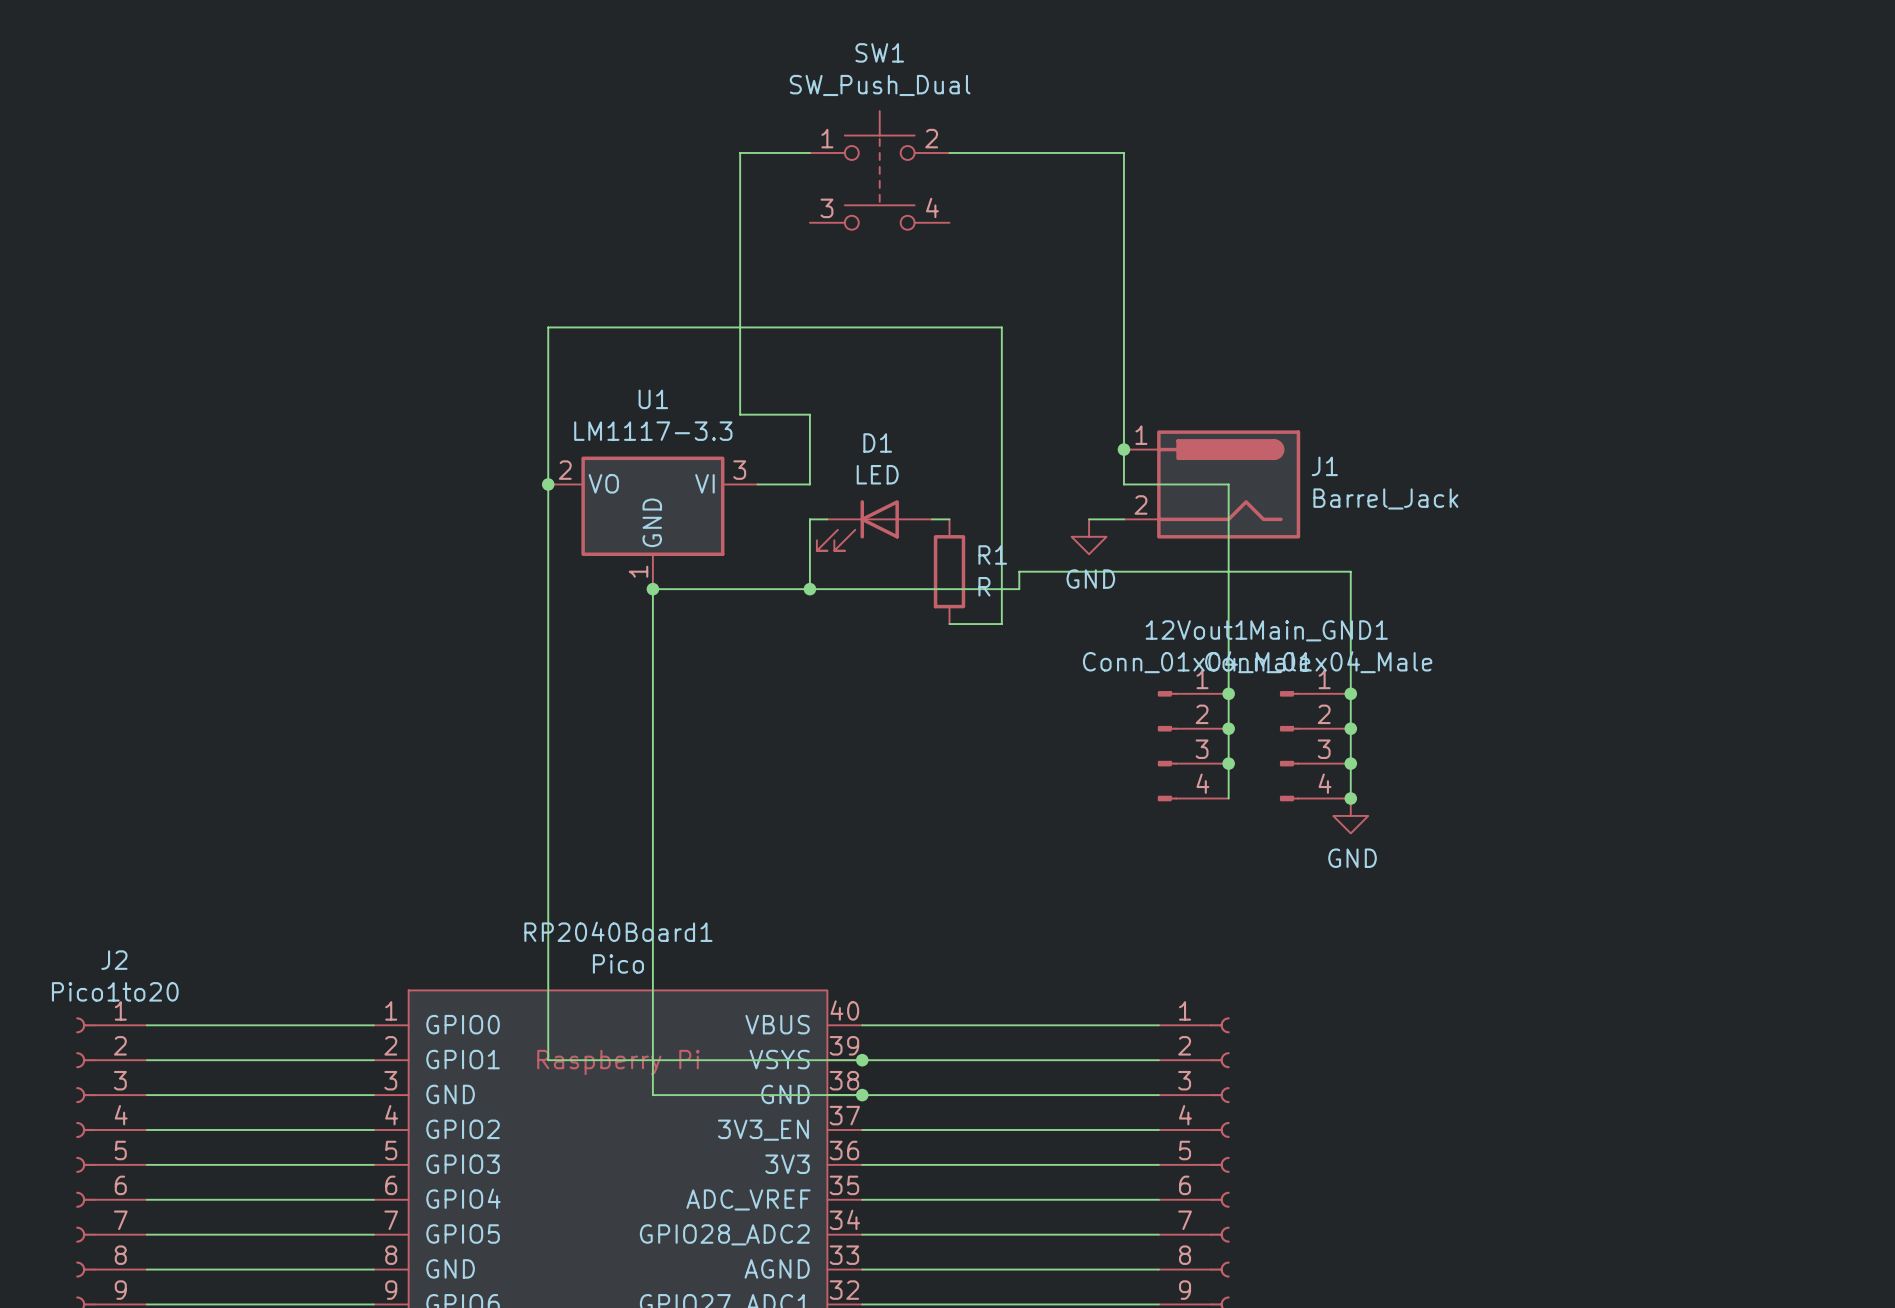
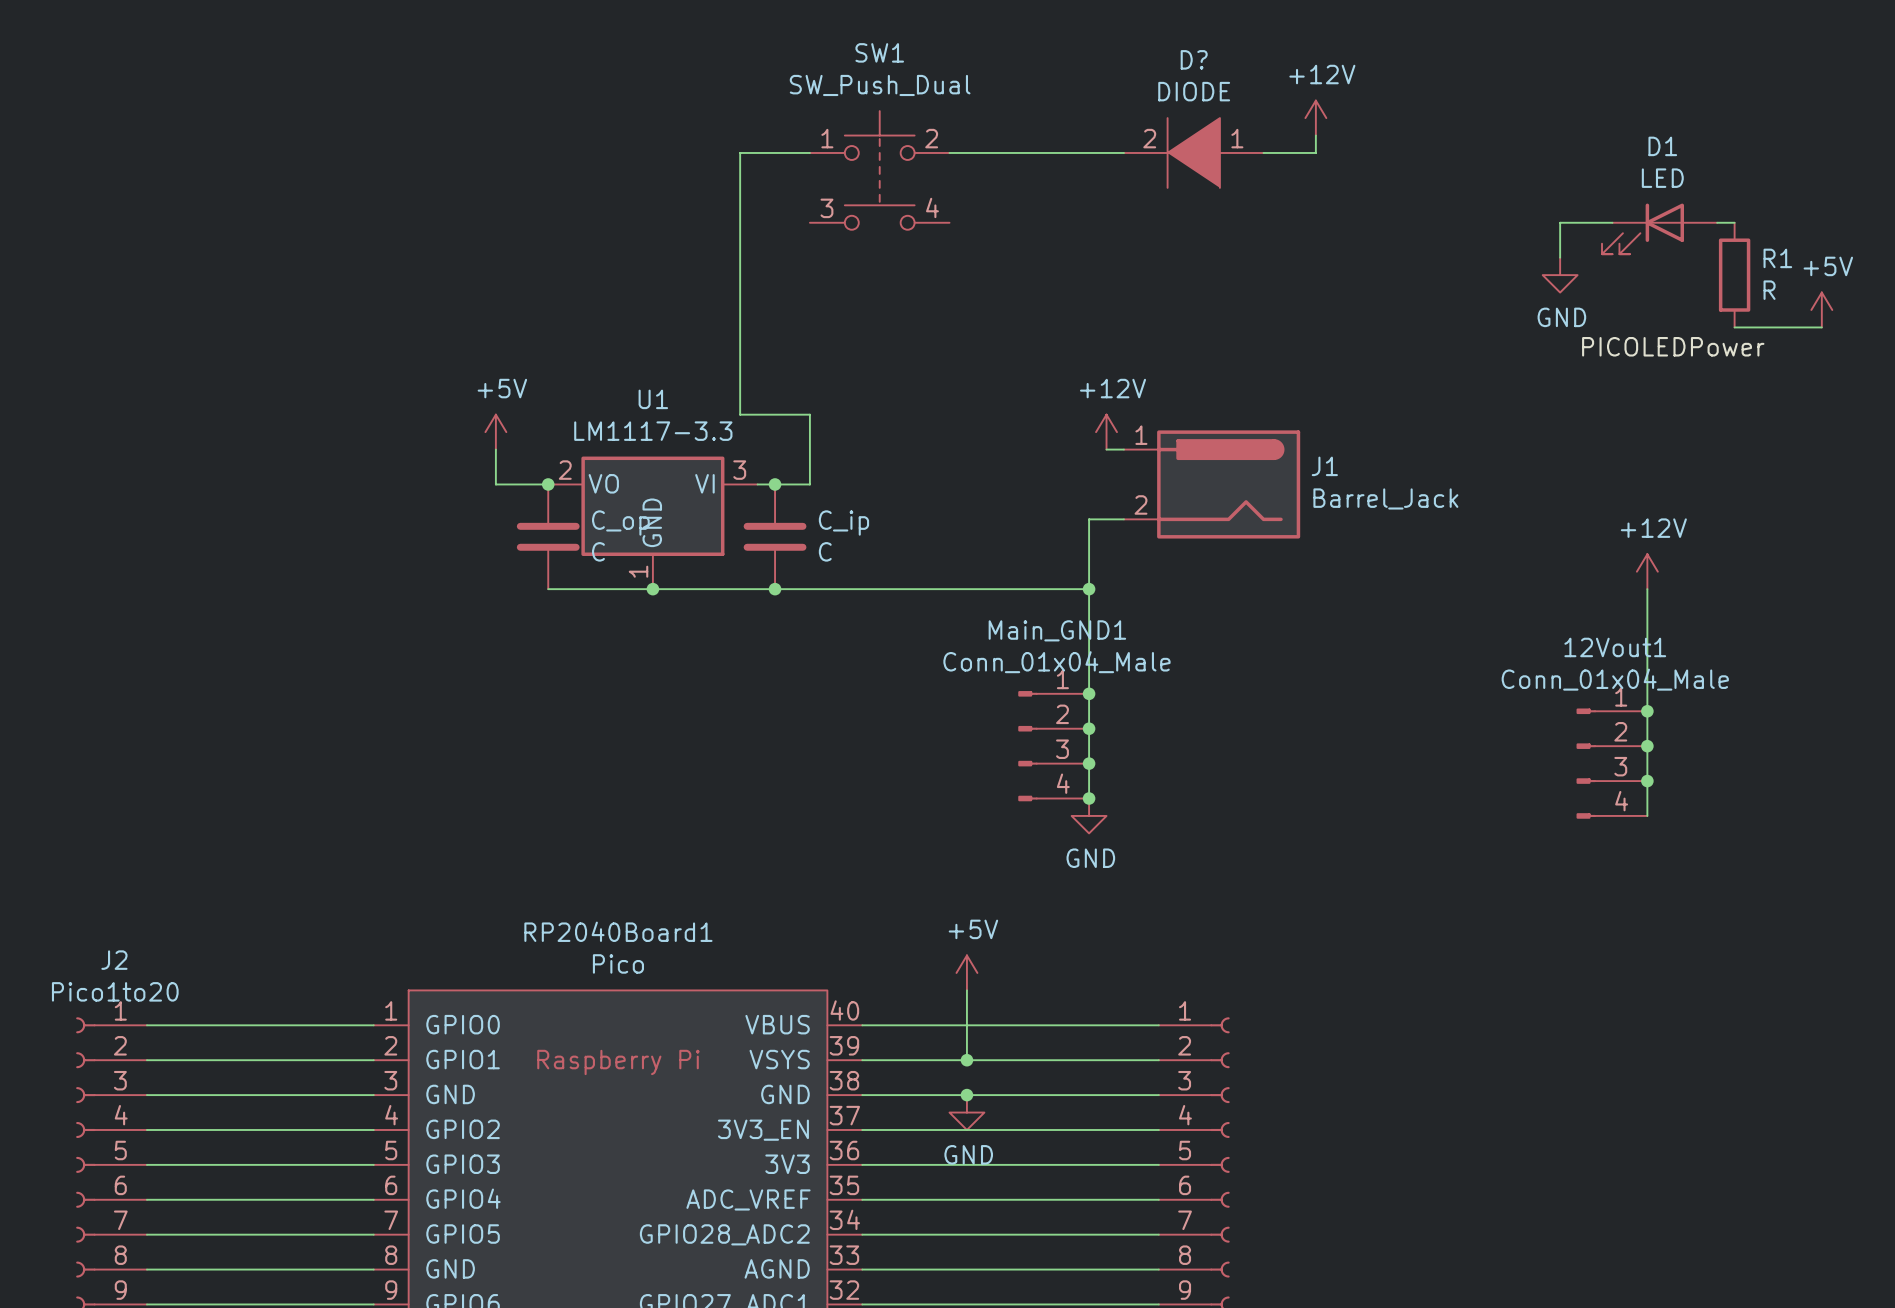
power symbol: none -> +12V (1315, 118)
wire: none -> (1315, 135) (1315, 152) (1263, 152)
wire: (1123, 152) (1123, 484) (1228, 484) (1228, 798) -> none
D?: none -> DIODE (1193, 152)
wire: none -> (1612, 222) (1560, 222) (1560, 257)
wire: none -> (1717, 222) (1734, 222)
power symbol: none -> GND (1560, 275)
power symbol: none -> +5V (1821, 310)
wire: none -> (1734, 327) (1821, 327)
label: none -> PICOLEDPower (1673, 346)
power symbol: none -> +5V (495, 432)
power symbol: none -> +12V (1106, 432)
wire: none -> (495, 449) (495, 484) (548, 484)
junction: (1123, 449) -> none
junction: none -> (775, 484)
wire: (827, 519) (809, 519) (809, 589) -> none
wire: (932, 519) (949, 519) -> (1106, 449) (1123, 449)
wire: none -> (1089, 519) (1089, 798)
D1 position: (874, 525) -> (1659, 228)
C_op: none -> C (548, 536)
C_ip: none -> C (775, 536)
power symbol: GND (1089, 536) -> none
R1 position: (949, 571) -> (1734, 275)
power symbol: none -> +12V (1647, 571)
wire: (652, 589) (652, 1095) (862, 1095) -> (652, 589) (548, 589)
junction position: (809, 589) -> (775, 589)
wire: (1019, 589) (1019, 571) (1350, 571) (1350, 798) -> (1019, 589) (1089, 589)
junction: none -> (1089, 589)
wire: none -> (1647, 589) (1647, 815)
wire: (949, 624) (1001, 624) (1001, 327) (548, 327) (548, 1060) (862, 1060) -> none
junction: none -> (1089, 693)
junction: (1228, 693) -> none
junction: (1350, 693) -> none
junction: none -> (1647, 711)
junction: none -> (1089, 728)
junction: (1228, 728) -> none
junction: (1350, 728) -> none
12Vout1 position: (1193, 746) -> (1611, 763)
Main_GND1 position: (1315, 746) -> (1053, 746)
junction: none -> (1647, 746)
junction: none -> (1089, 763)
junction: (1228, 763) -> none
junction: (1350, 763) -> none
junction: none -> (1647, 781)
junction: none -> (1089, 798)
junction: (1350, 798) -> none
power symbol: none -> GND (1089, 815)
power symbol: GND (1350, 815) -> none
power symbol: none -> +5V (966, 972)
wire: none -> (966, 990) (966, 1060)
junction: (862, 1060) -> none
junction: none -> (966, 1060)
junction: (862, 1095) -> none
junction: none -> (966, 1095)
power symbol: none -> GND (966, 1112)

